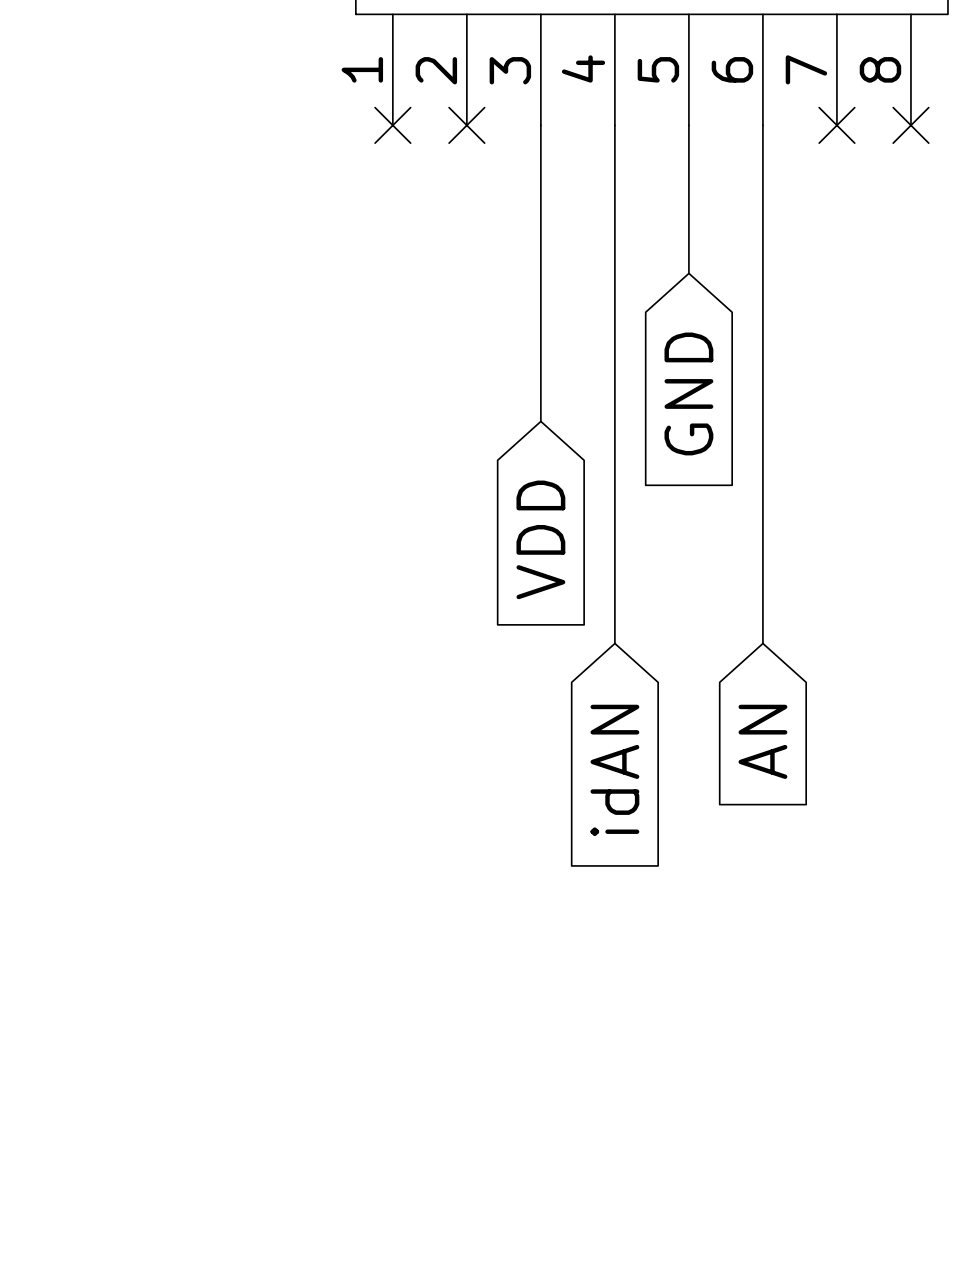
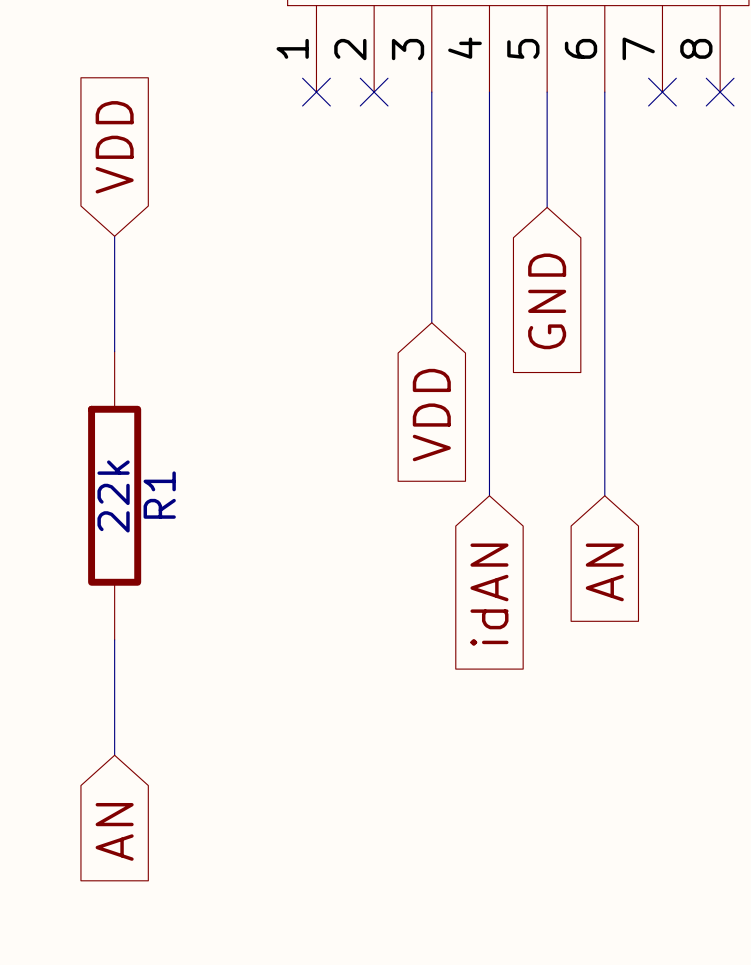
global label: none -> VDD (114, 147)
wire: none -> (114, 236) (114, 351)
R1: none -> 22k (114, 495)
wire: none -> (114, 639) (114, 755)
global label: none -> AN (114, 831)

